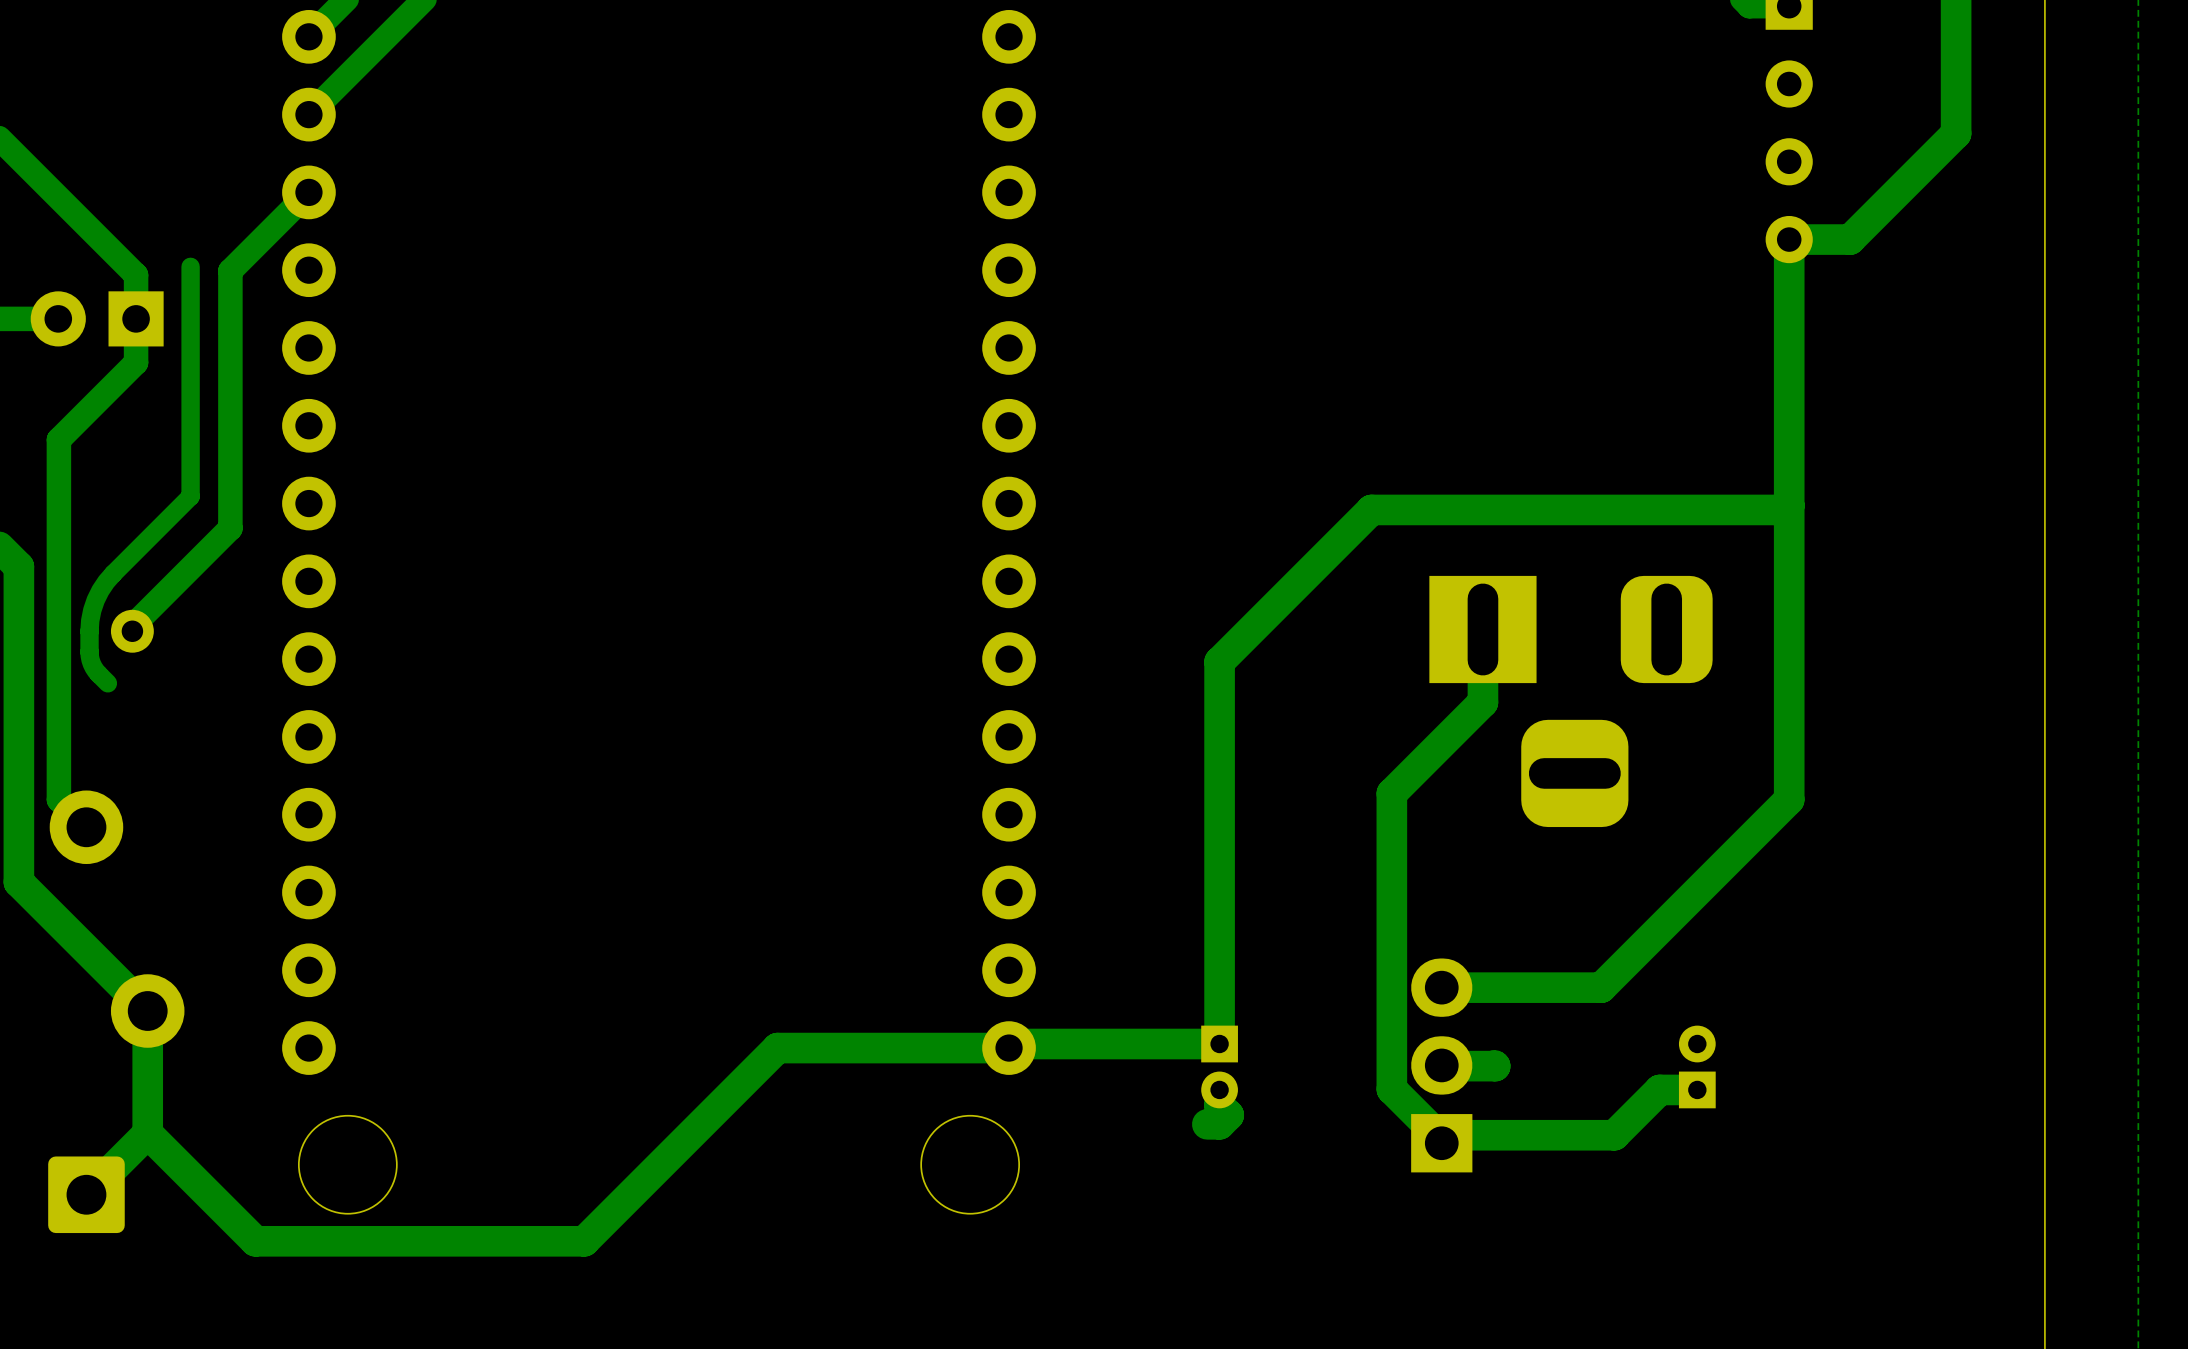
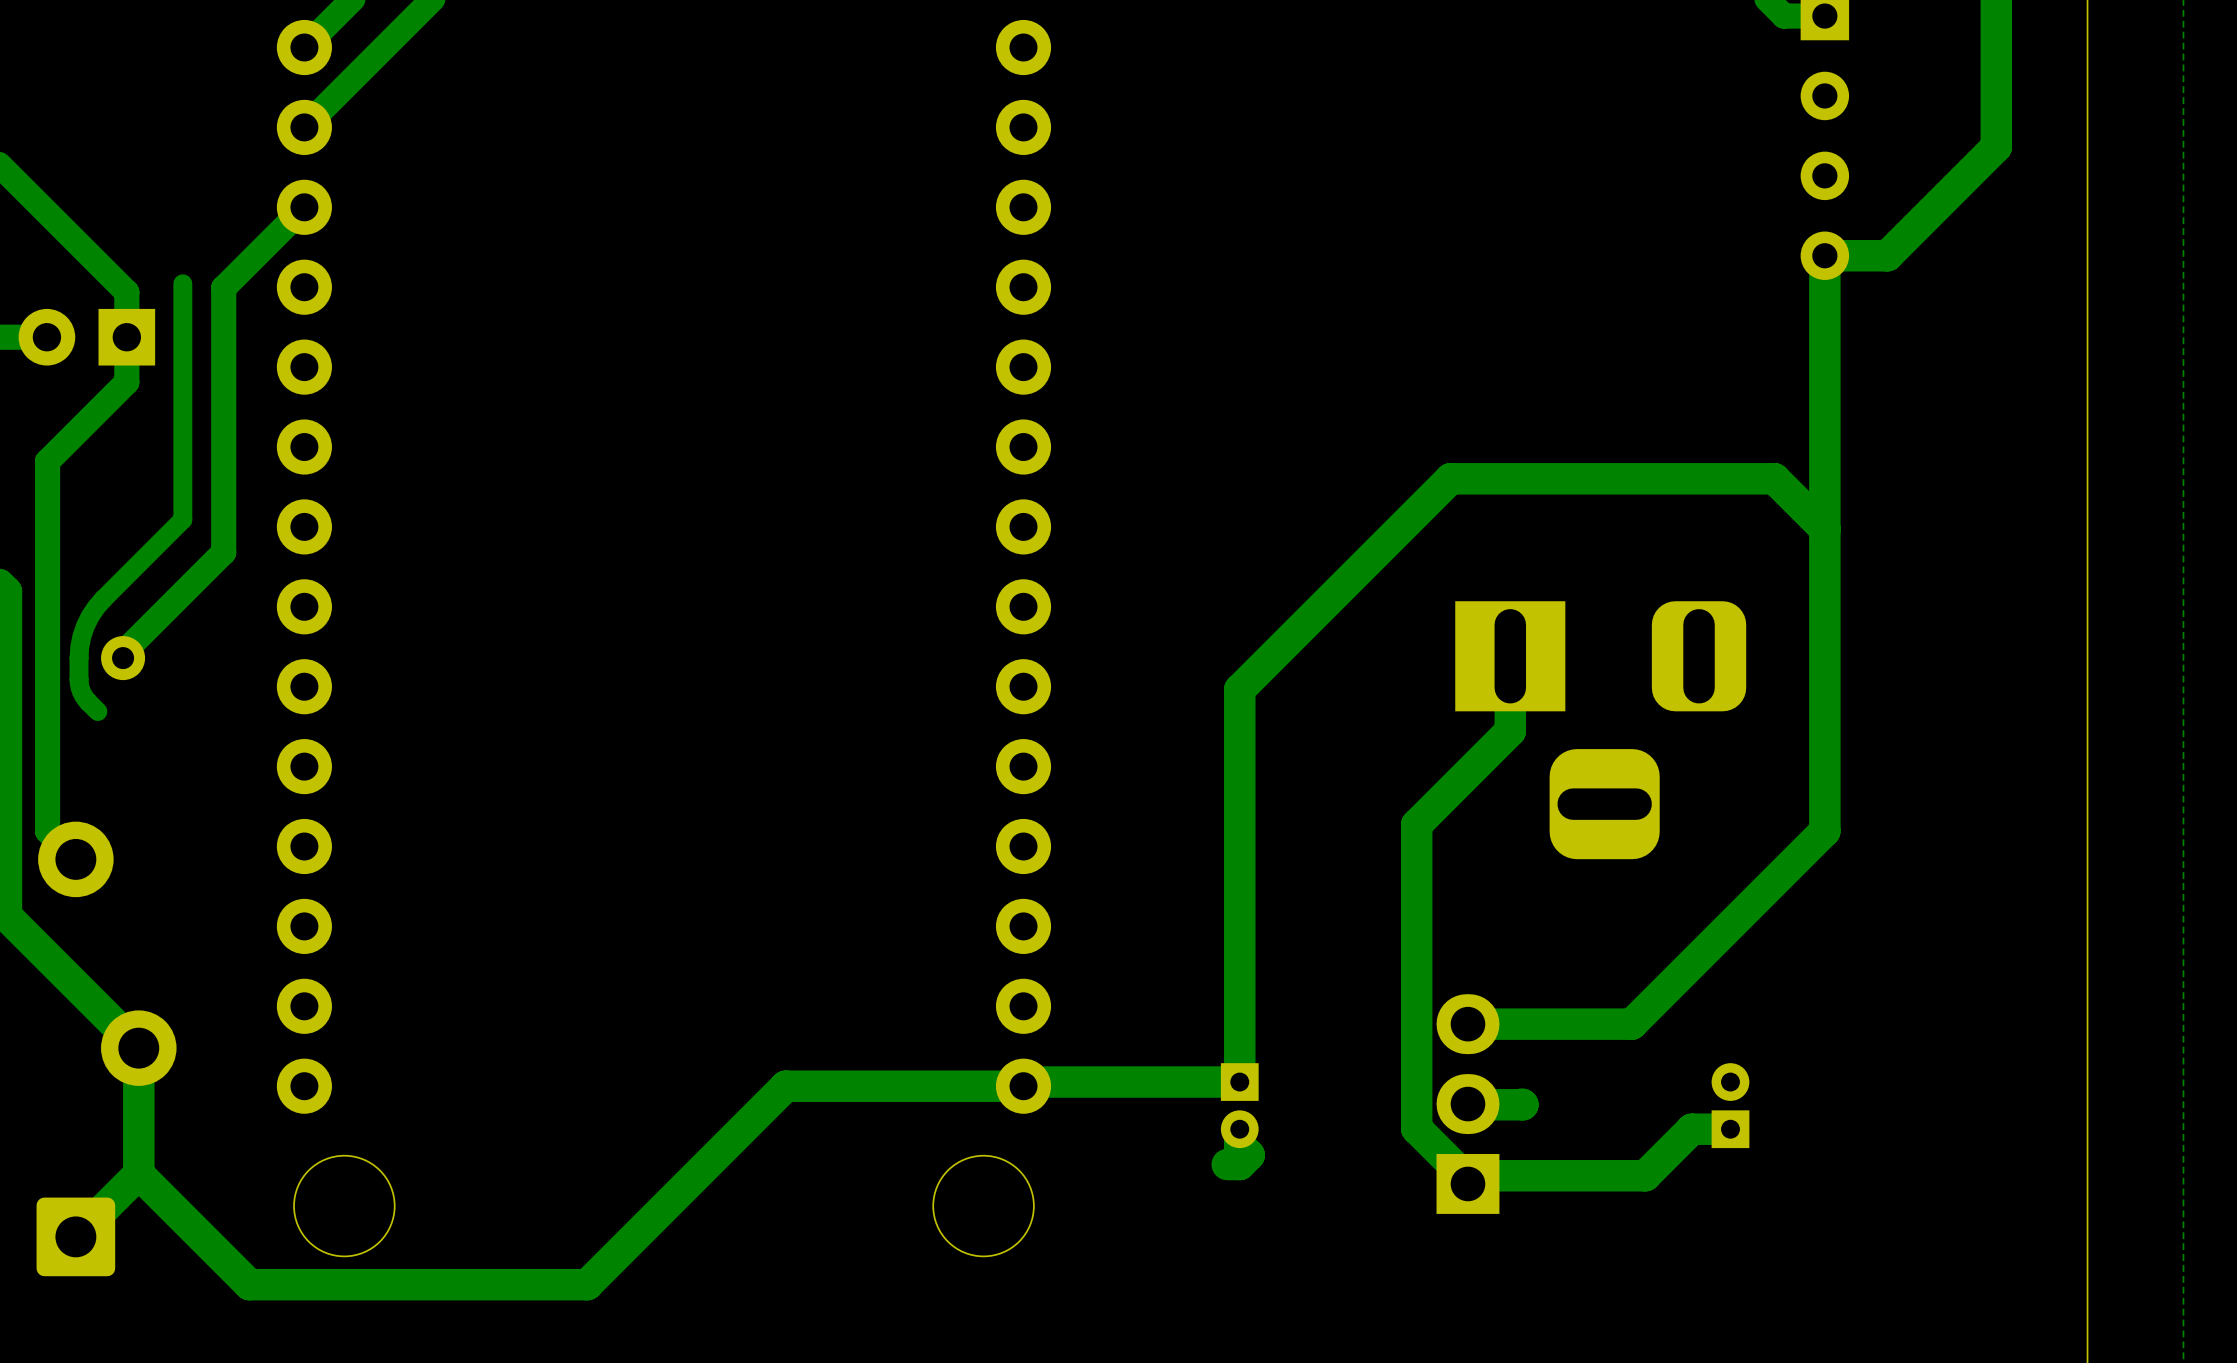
track: (1789, 505) (1784, 509) (1371, 509) -> (1824, 529) (1774, 478) (1450, 478) (1395, 533)

